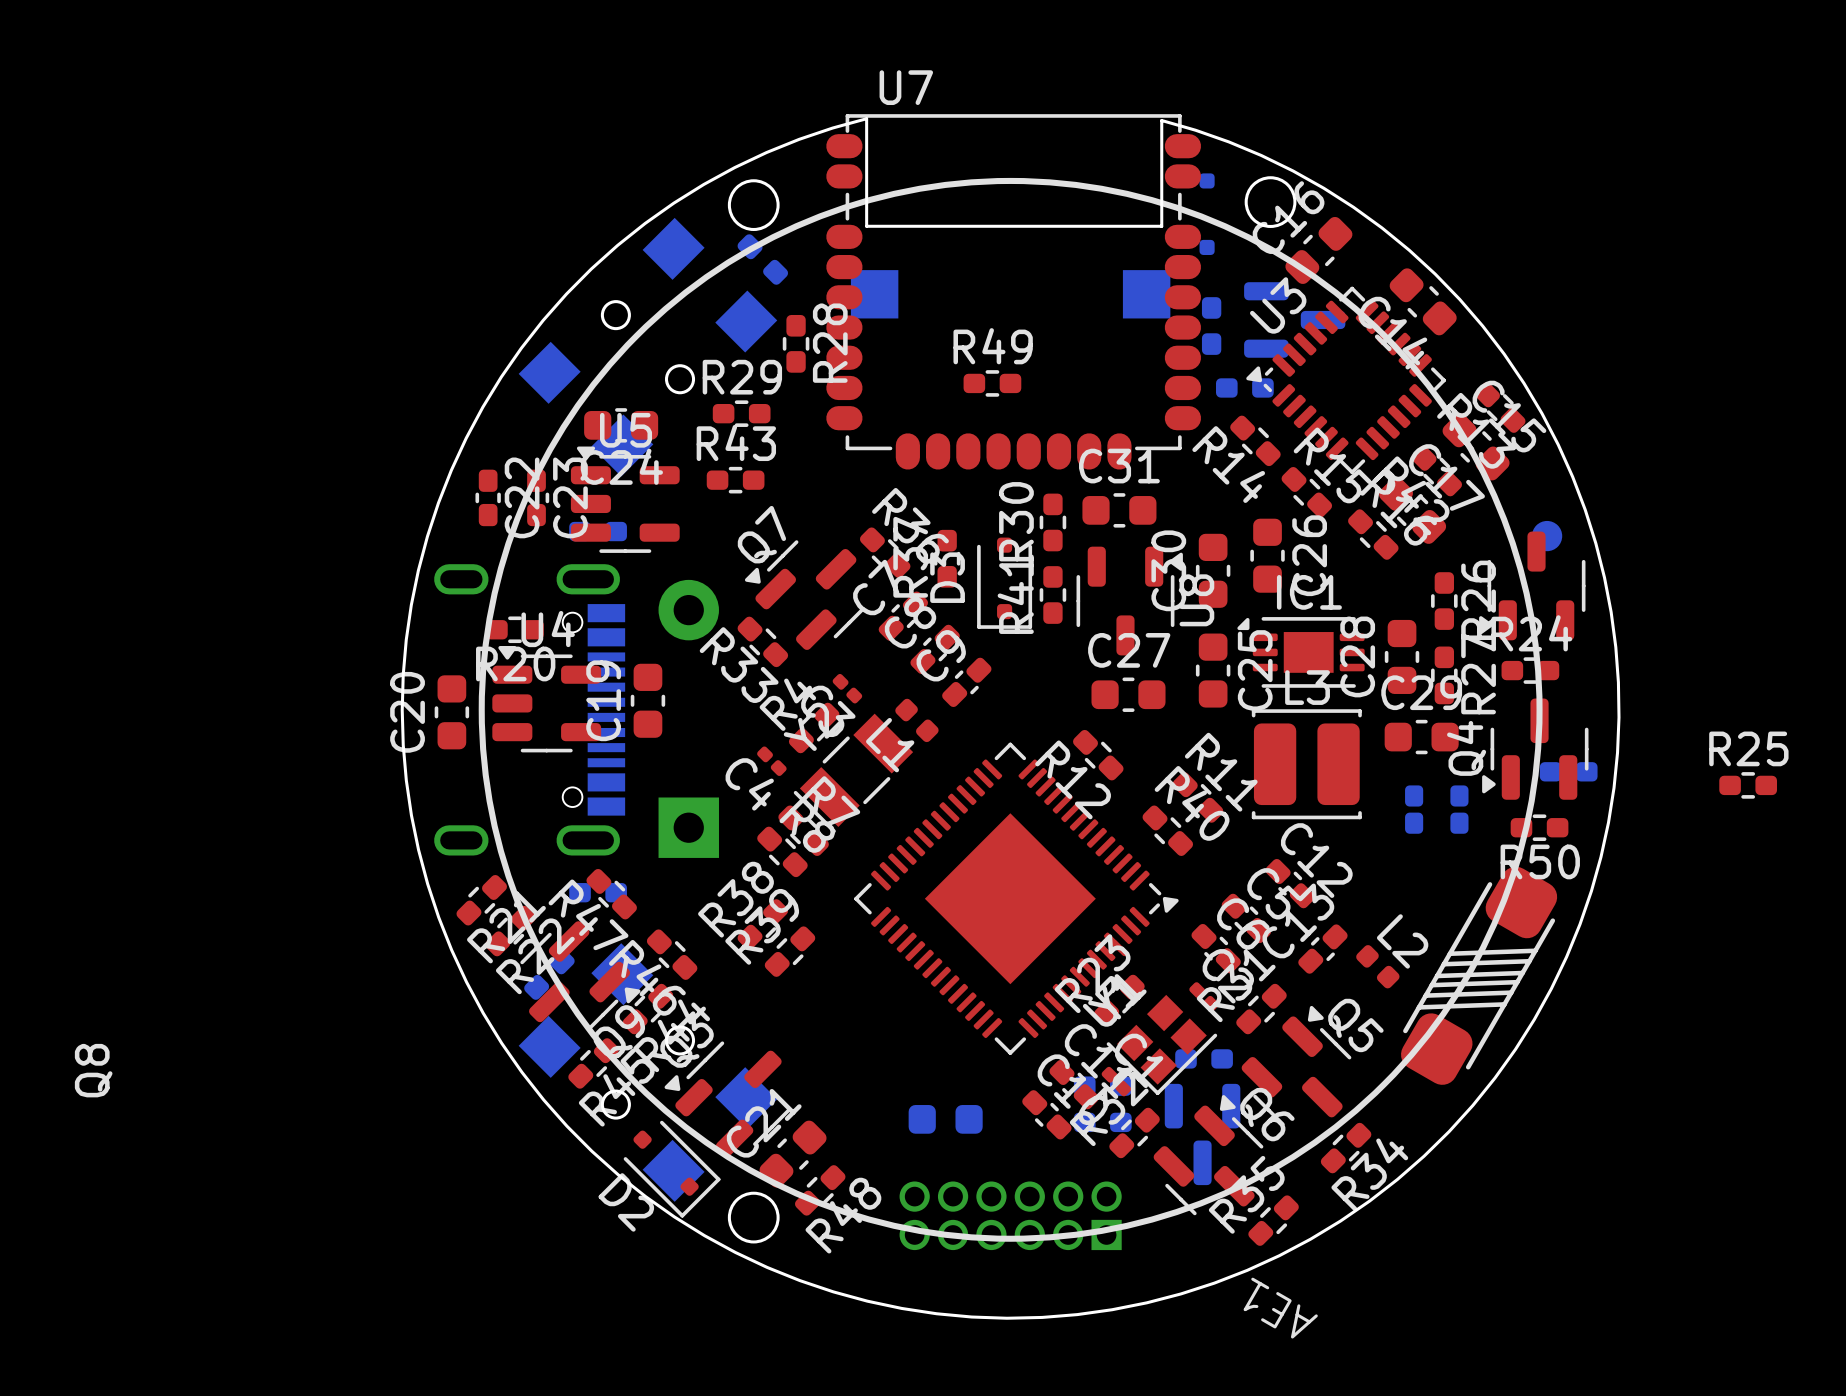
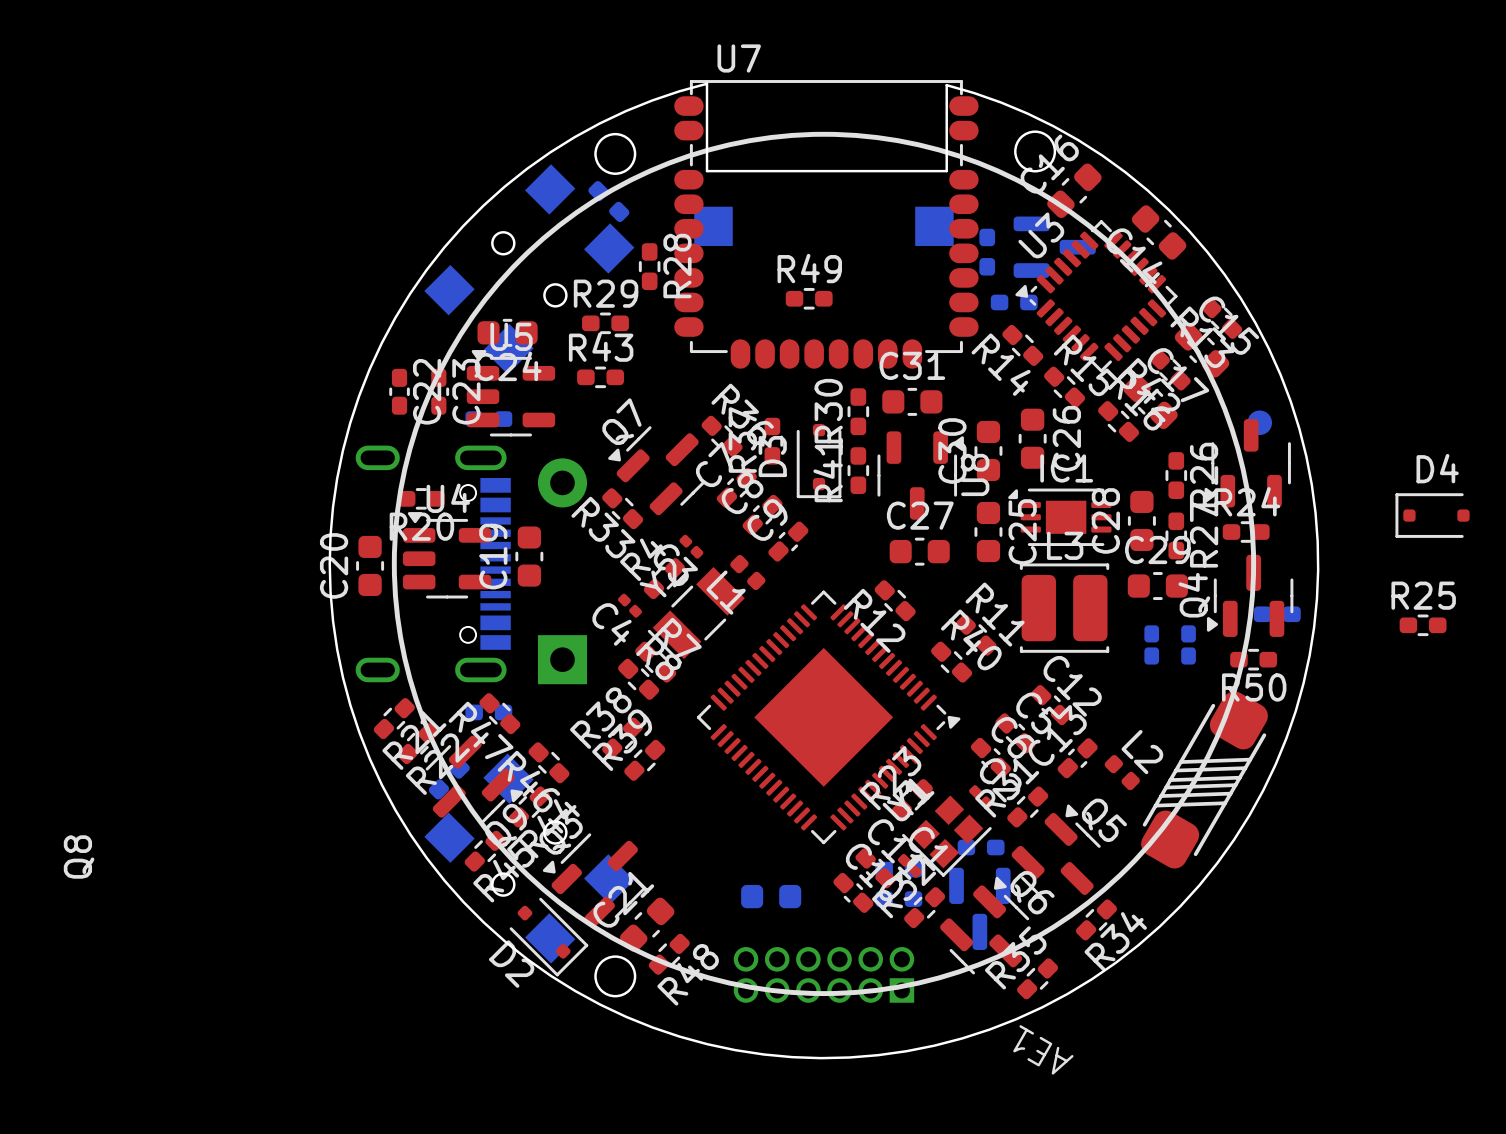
D4 side: bottom (1207, 214) -> top (1432, 515)
part position: (762, 259) -> (608, 201)

